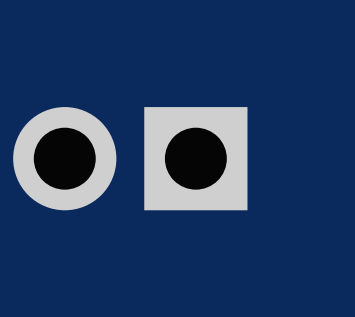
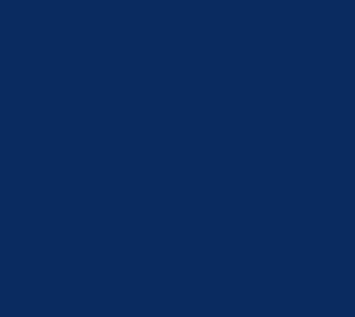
part: (130, 158) -> none

